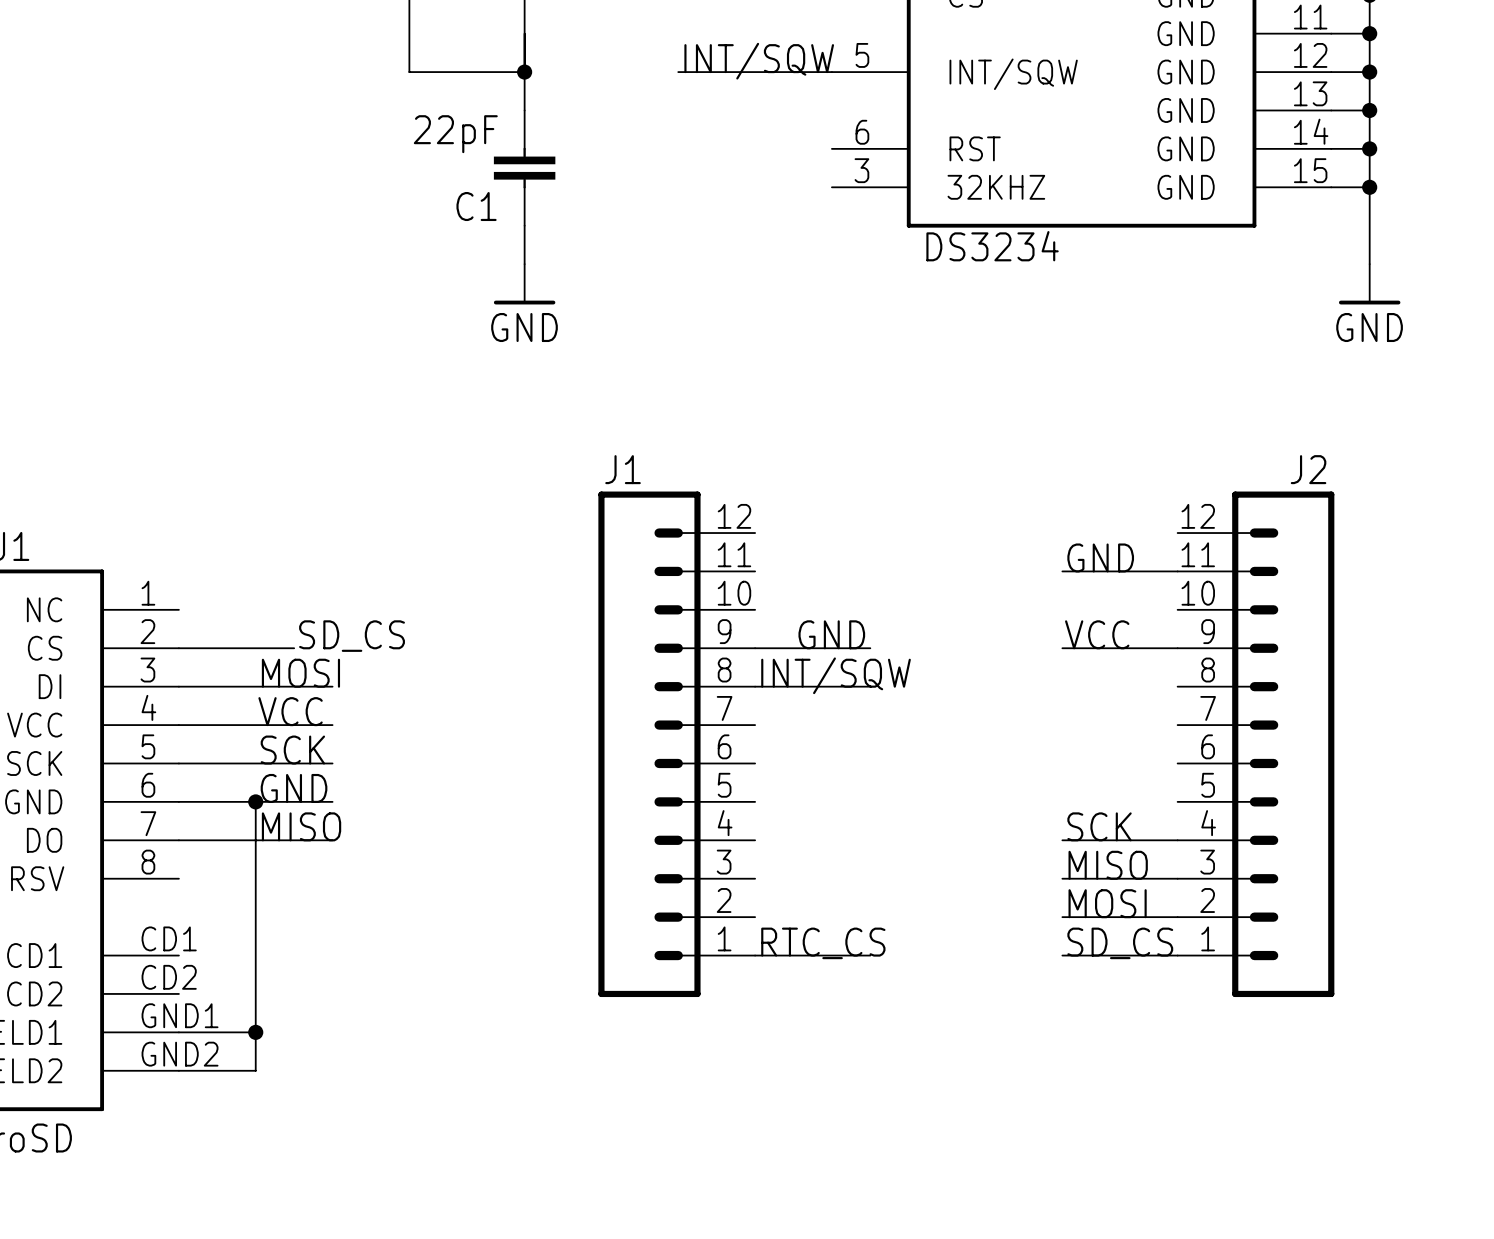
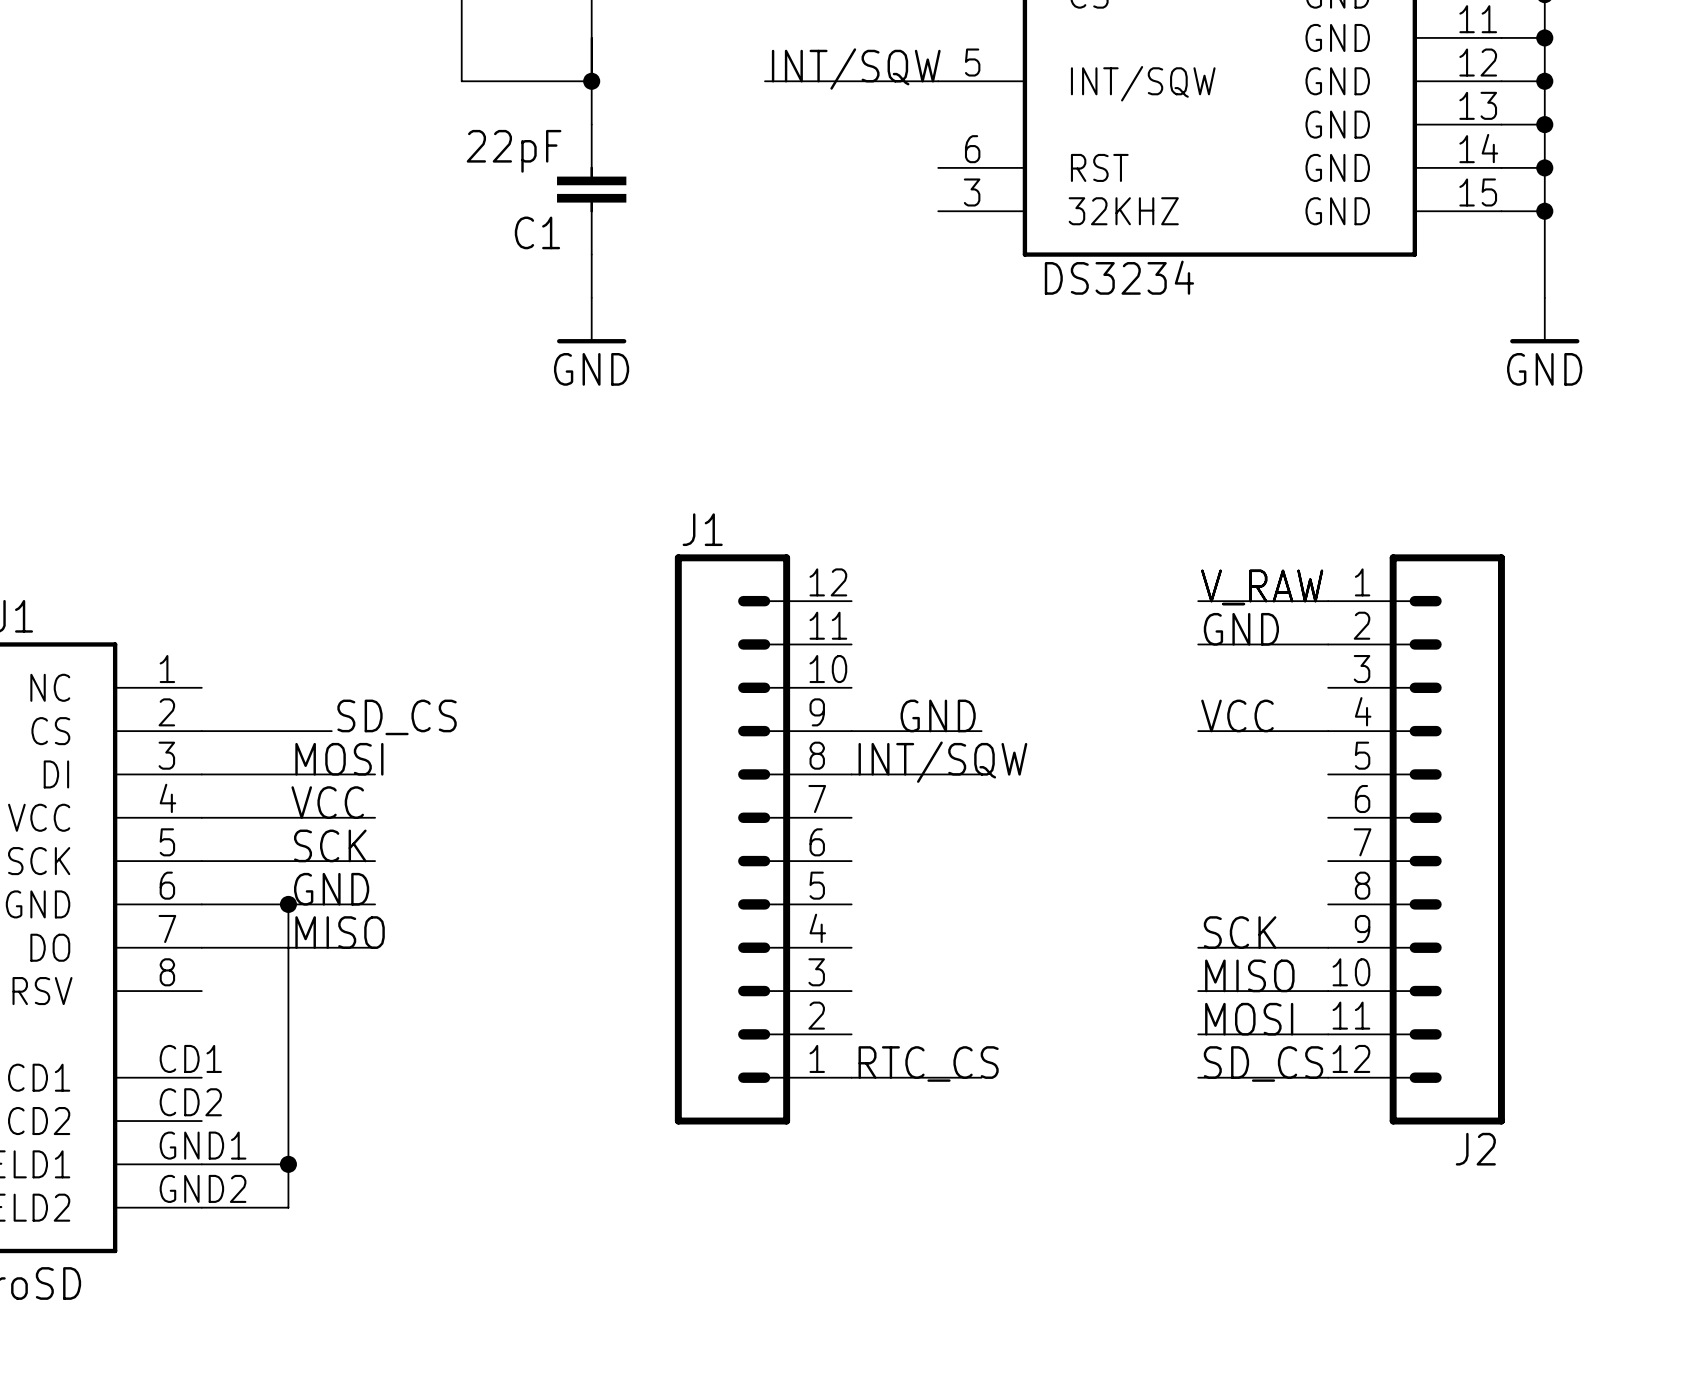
label: none -> V_RAW (1262, 587)
wire: none -> (1198, 601) (1328, 601)
J2 flip: as is (1283, 744) -> up-down (1447, 839)

